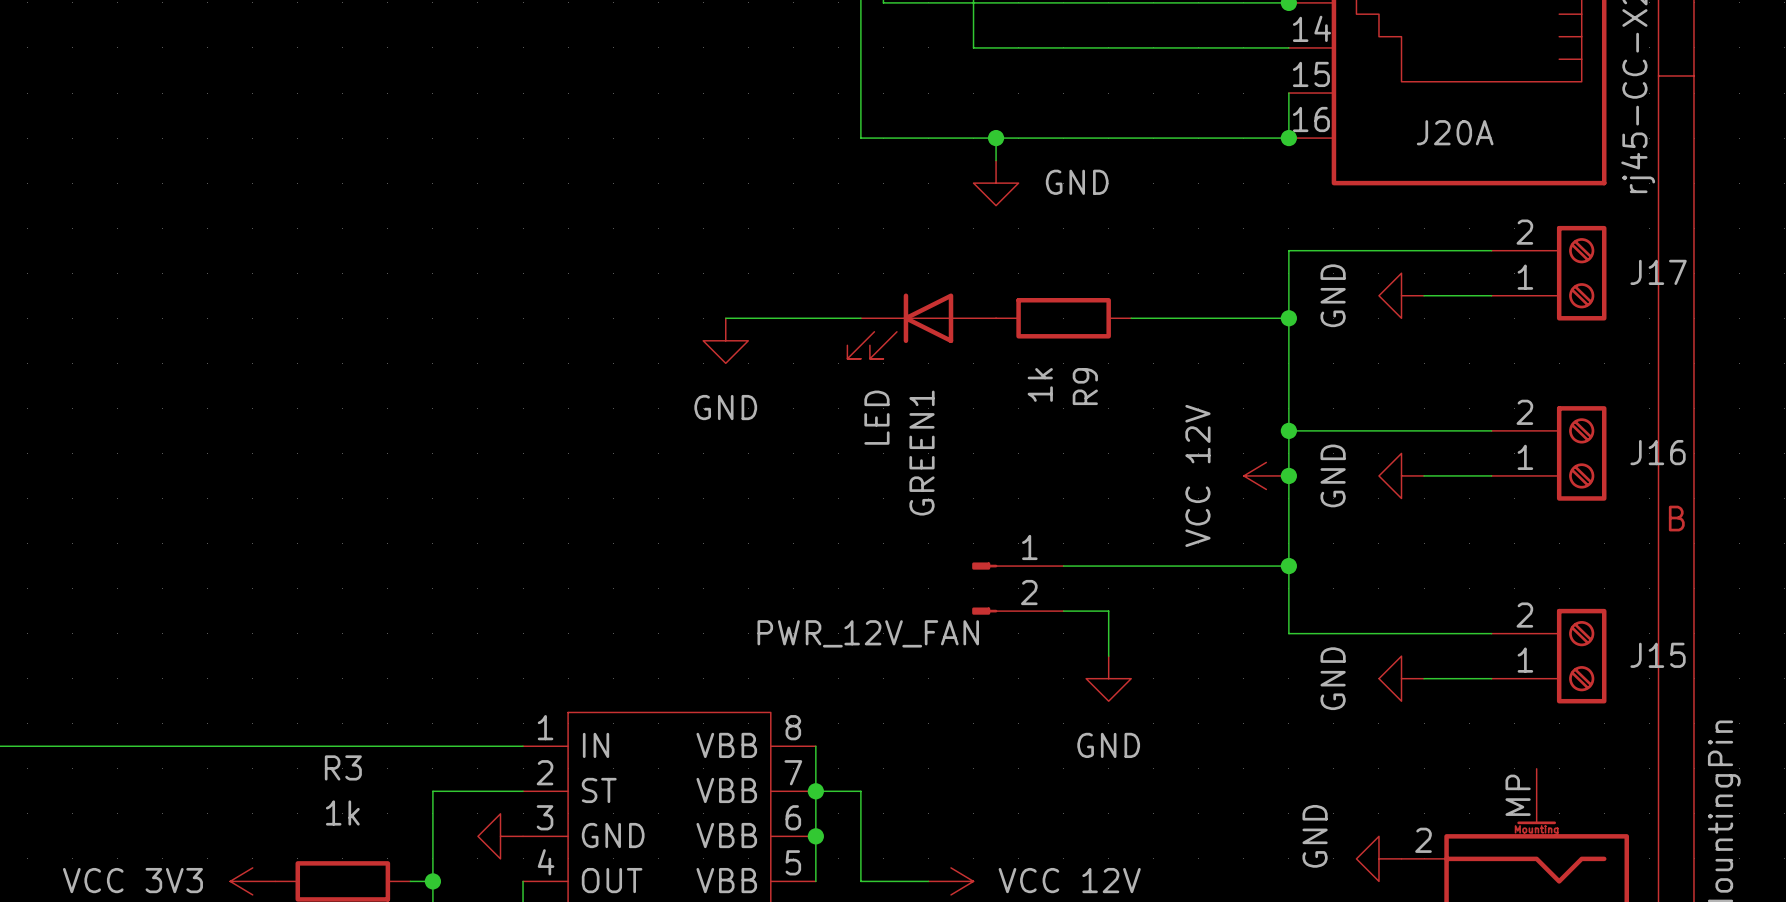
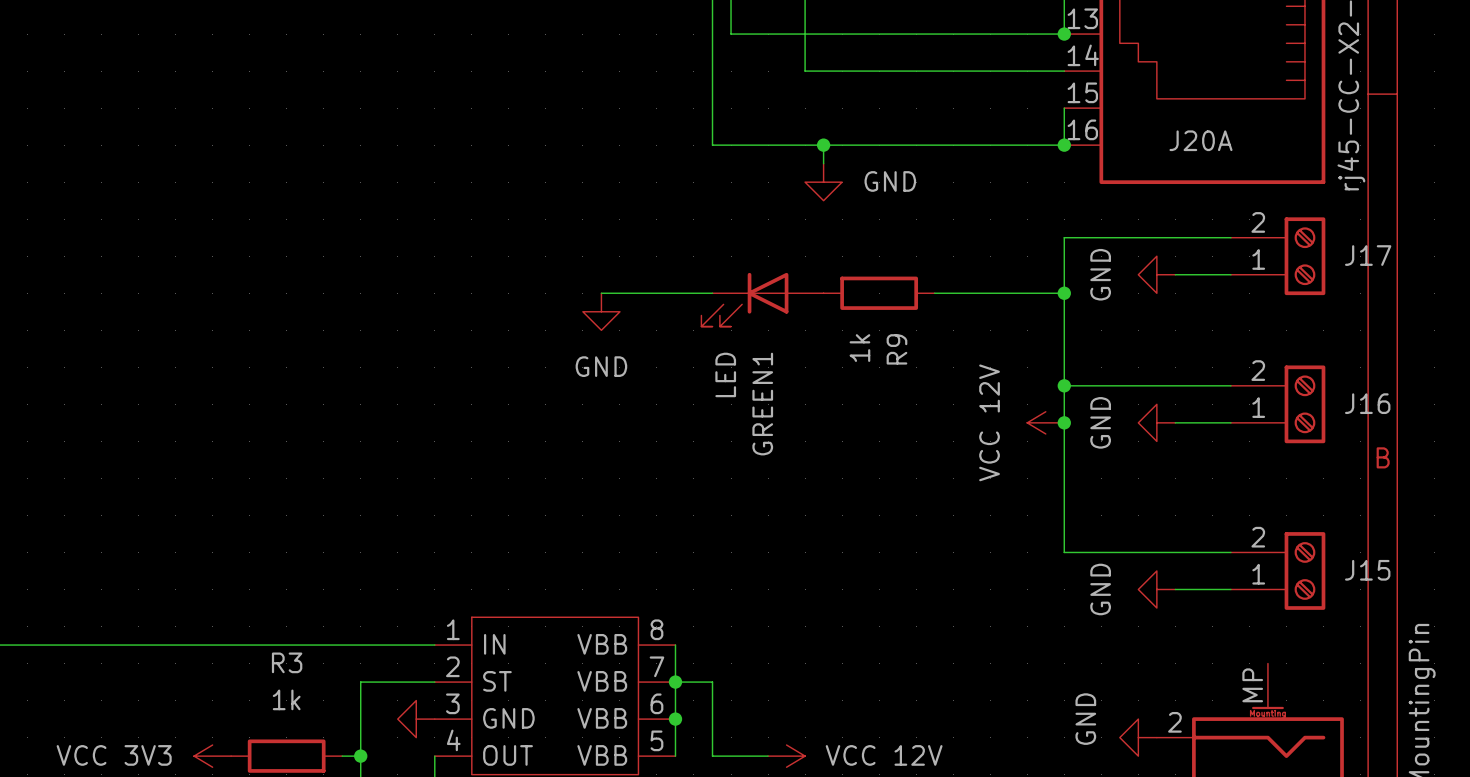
wire: (1063, 566) (1288, 566) -> none
junction: (1288, 566) -> none
PWR_12V_FAN: (1017, 588) -> none
wire: (1063, 611) (1108, 611) (1108, 656) -> none
power symbol: GND (1108, 678) -> none

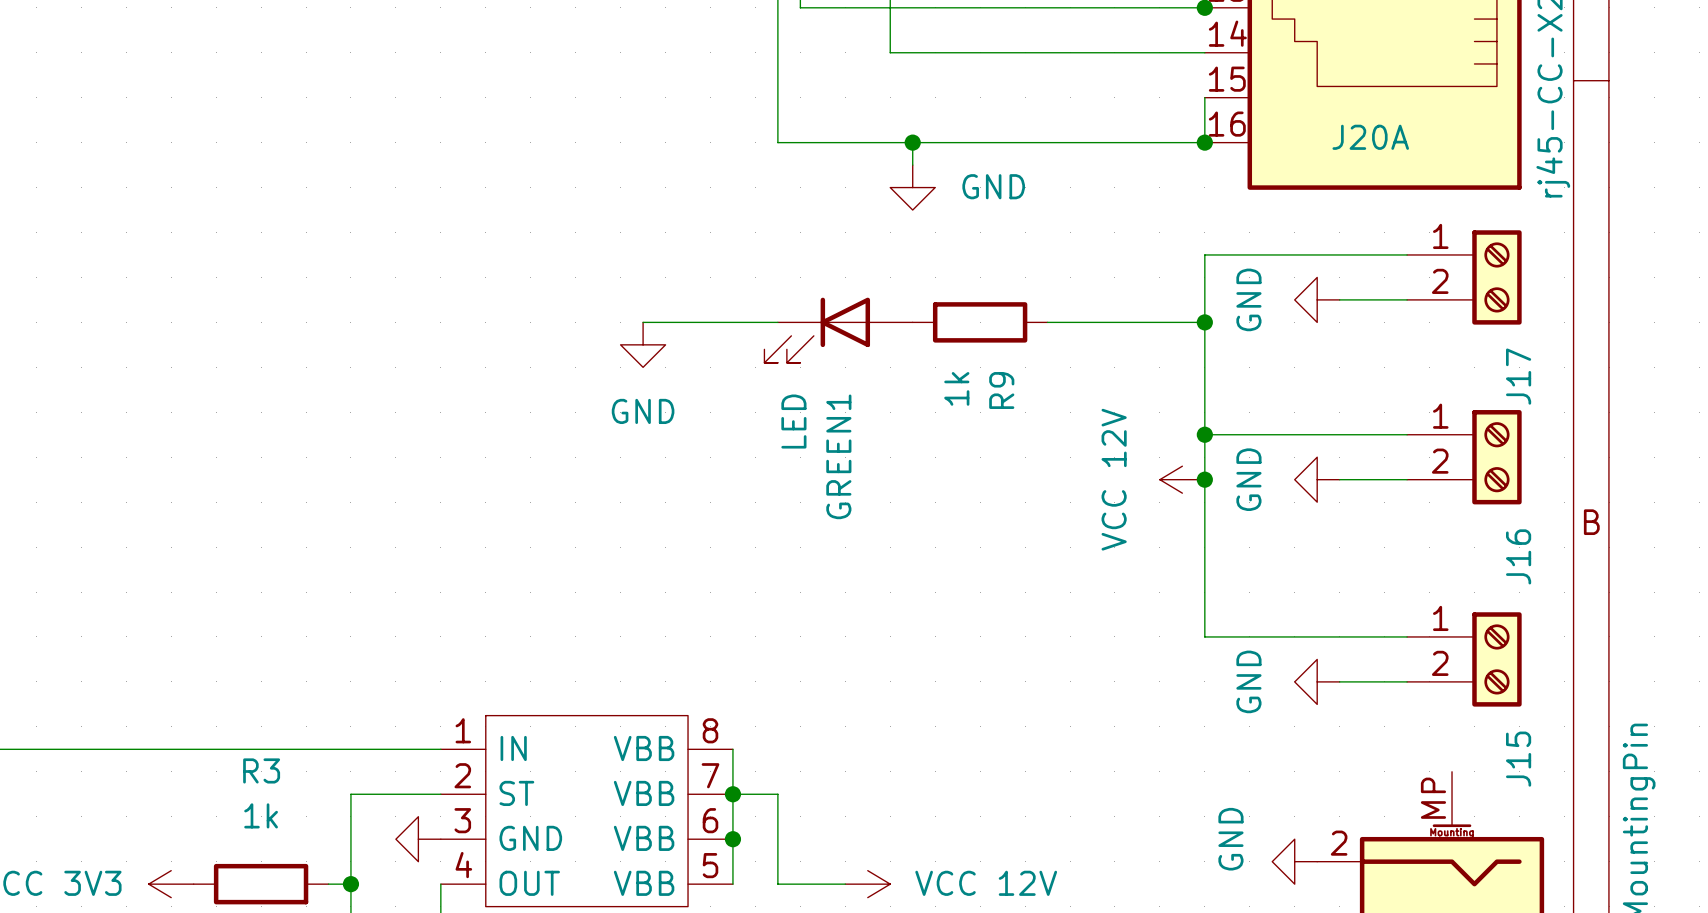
J17 pin number: 2 (1258, 222) -> 1 (1440, 236)
J17 name rotation: 0° (1368, 255) -> 90° counterclockwise (1518, 376)
J17 name position: J17 (1368, 255) -> J17 (1518, 376)
J17 pin number: 1 (1258, 259) -> 2 (1440, 281)
J16 pin number: 2 (1258, 370) -> 1 (1440, 416)
J16 name rotation: 0° (1367, 403) -> 90° counterclockwise (1518, 556)
J16 name position: J16 (1367, 403) -> J16 (1518, 556)
J16 pin number: 1 (1258, 407) -> 2 (1440, 461)
J15 pin number: 2 (1258, 537) -> 1 (1440, 618)
J15 name rotation: 0° (1367, 570) -> 90° counterclockwise (1518, 759)
J15 name position: J15 (1367, 570) -> J15 (1518, 759)
J15 pin number: 1 (1258, 574) -> 2 (1440, 663)

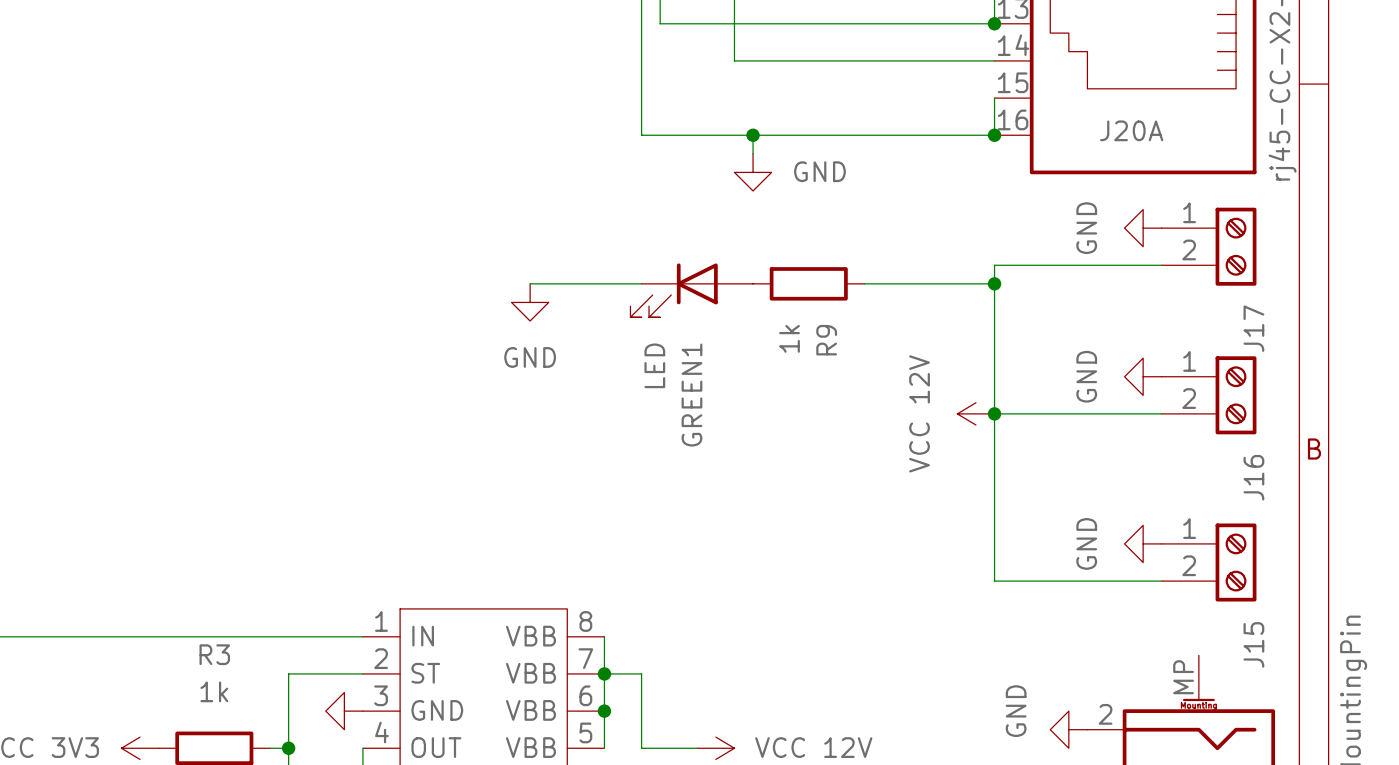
power symbol: none -> GND (1143, 228)
wire: (1407, 254) (1204, 254) (1204, 299) -> (1105, 265) (994, 265)
power symbol: GND (1317, 299) -> none
wire: (1204, 434) (1407, 434) -> none
junction: (1204, 434) -> none
power symbol: none -> GND (1143, 376)
wire: none -> (994, 413) (1105, 413)
power symbol: GND (1317, 479) -> none
wire: (1204, 636) (1407, 636) -> (994, 543) (994, 581) (1105, 581)
power symbol position: GND (1317, 681) -> GND (1143, 543)

